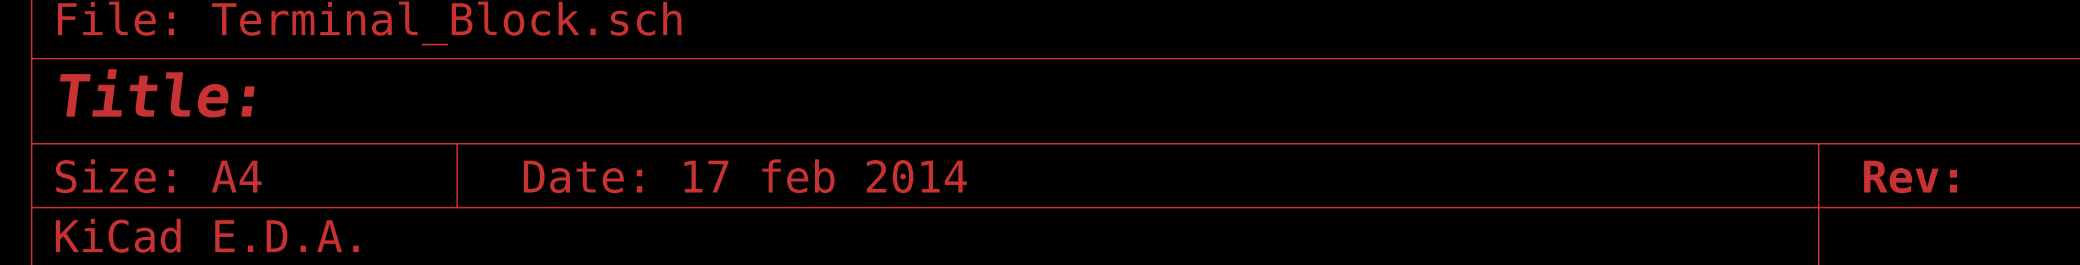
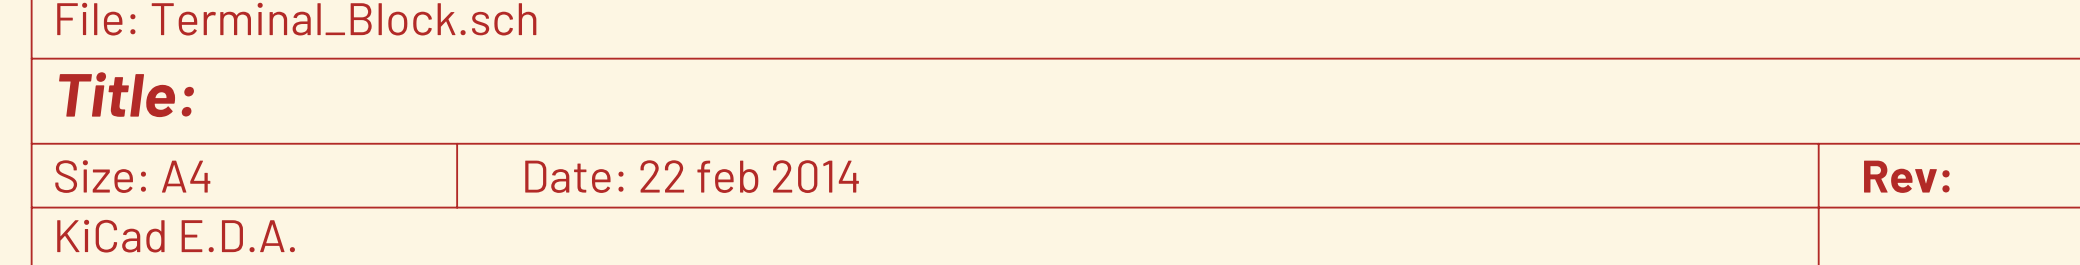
title block: Date: 17 feb 2014 (745, 176) -> Date: 22 feb 2014 (692, 176)

